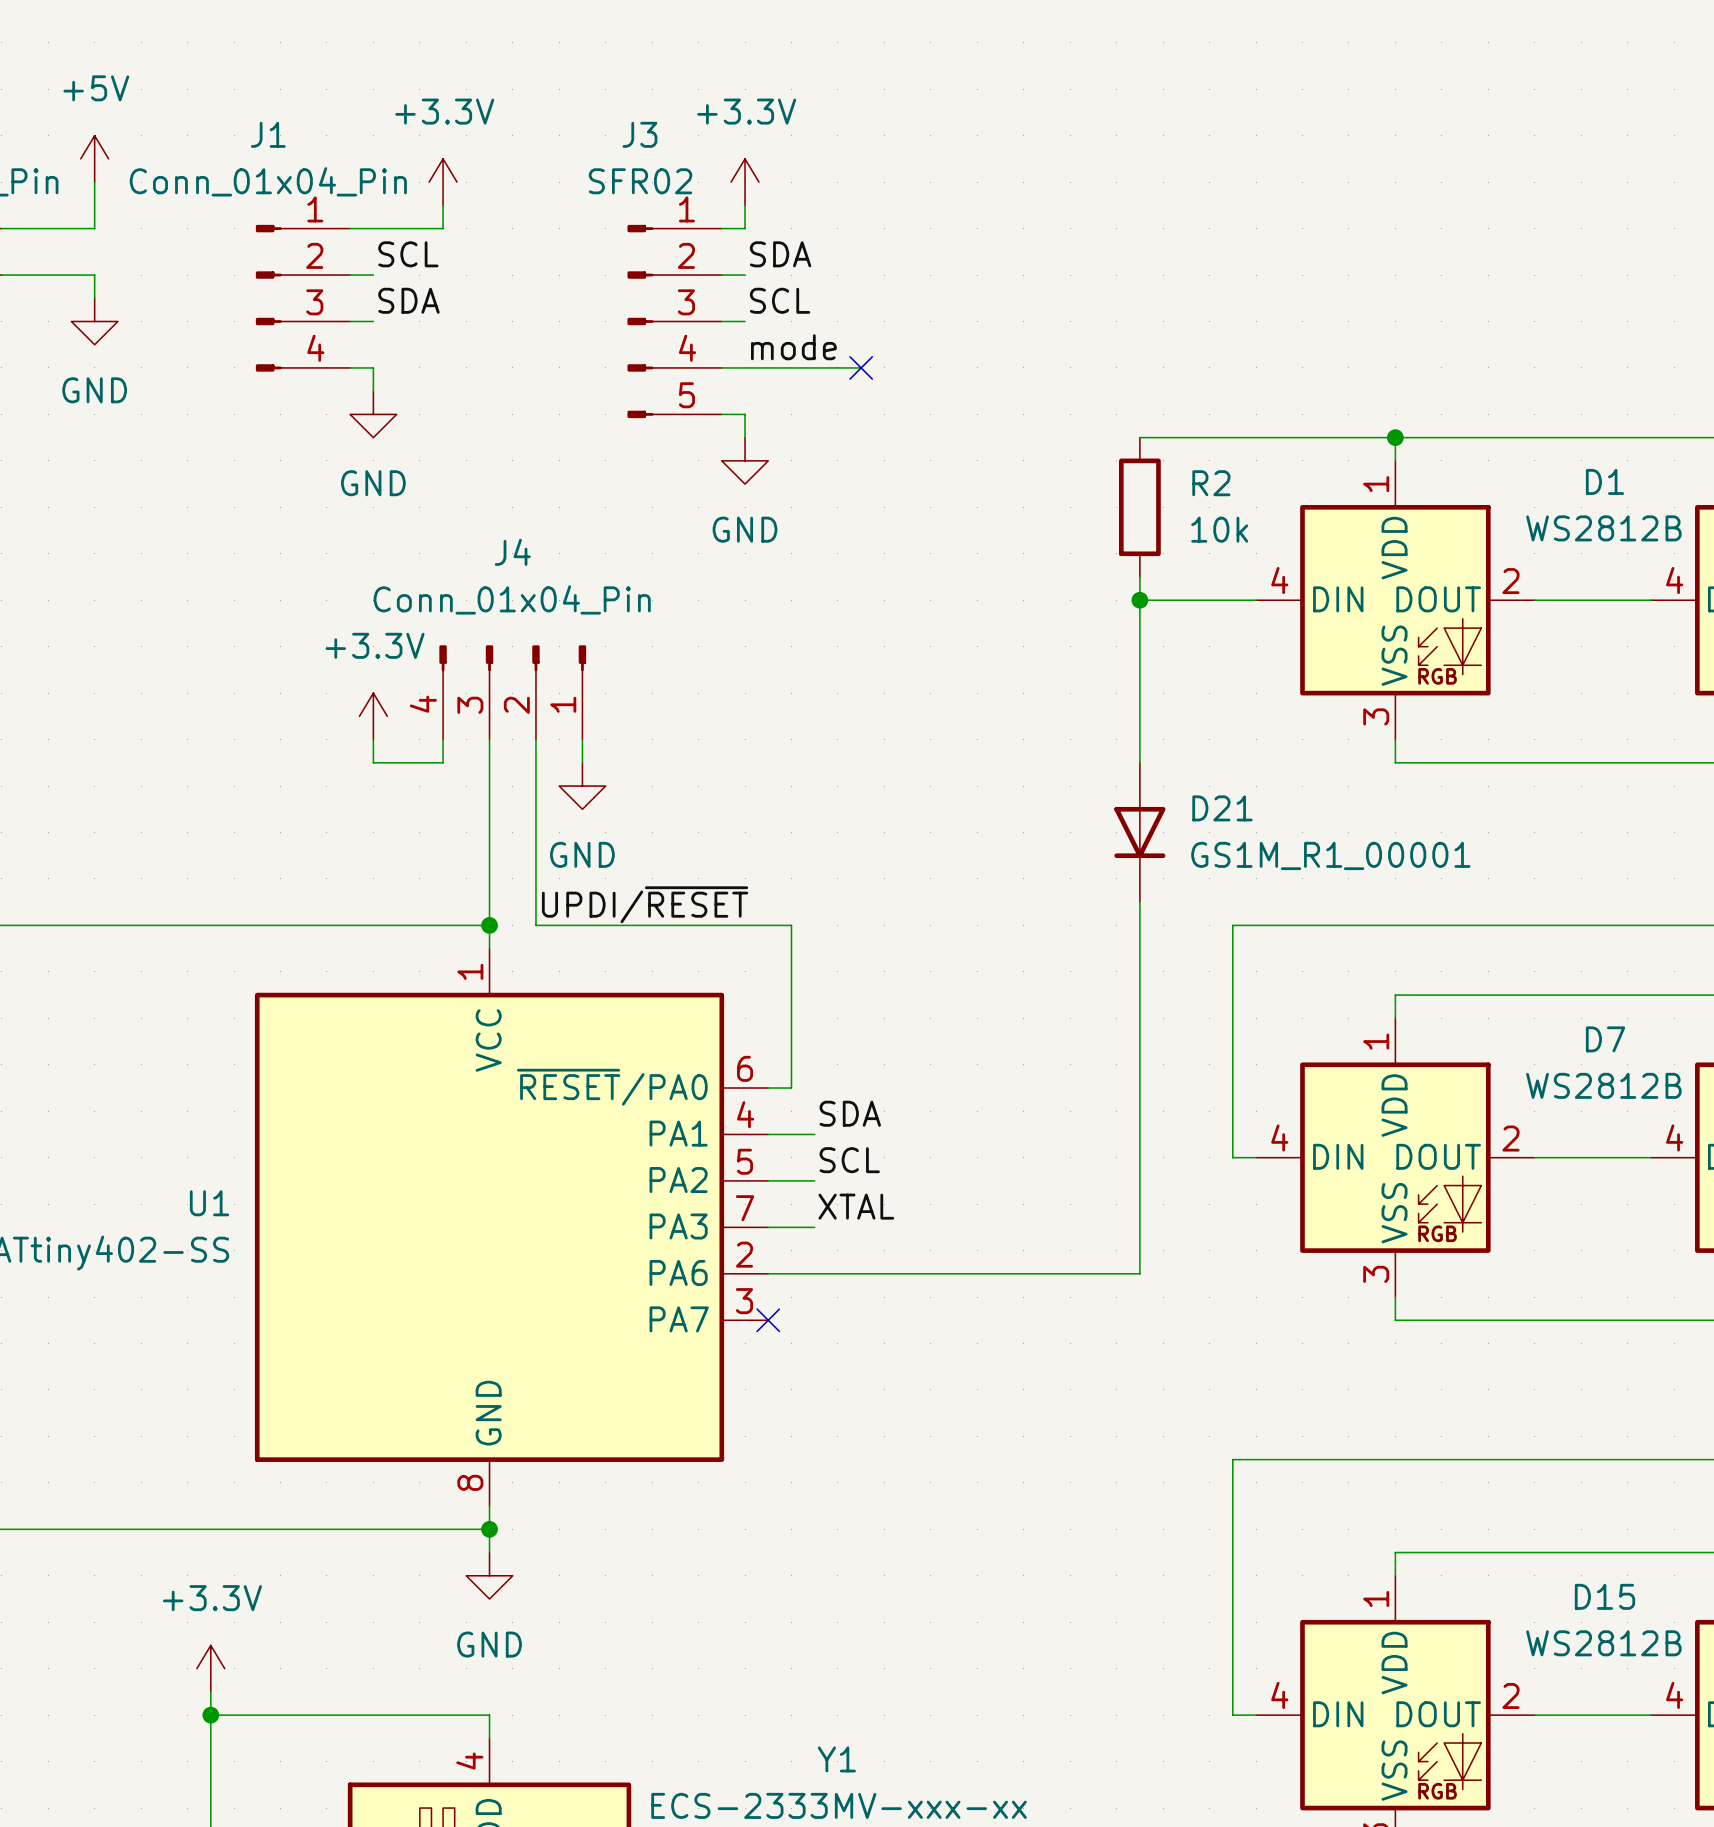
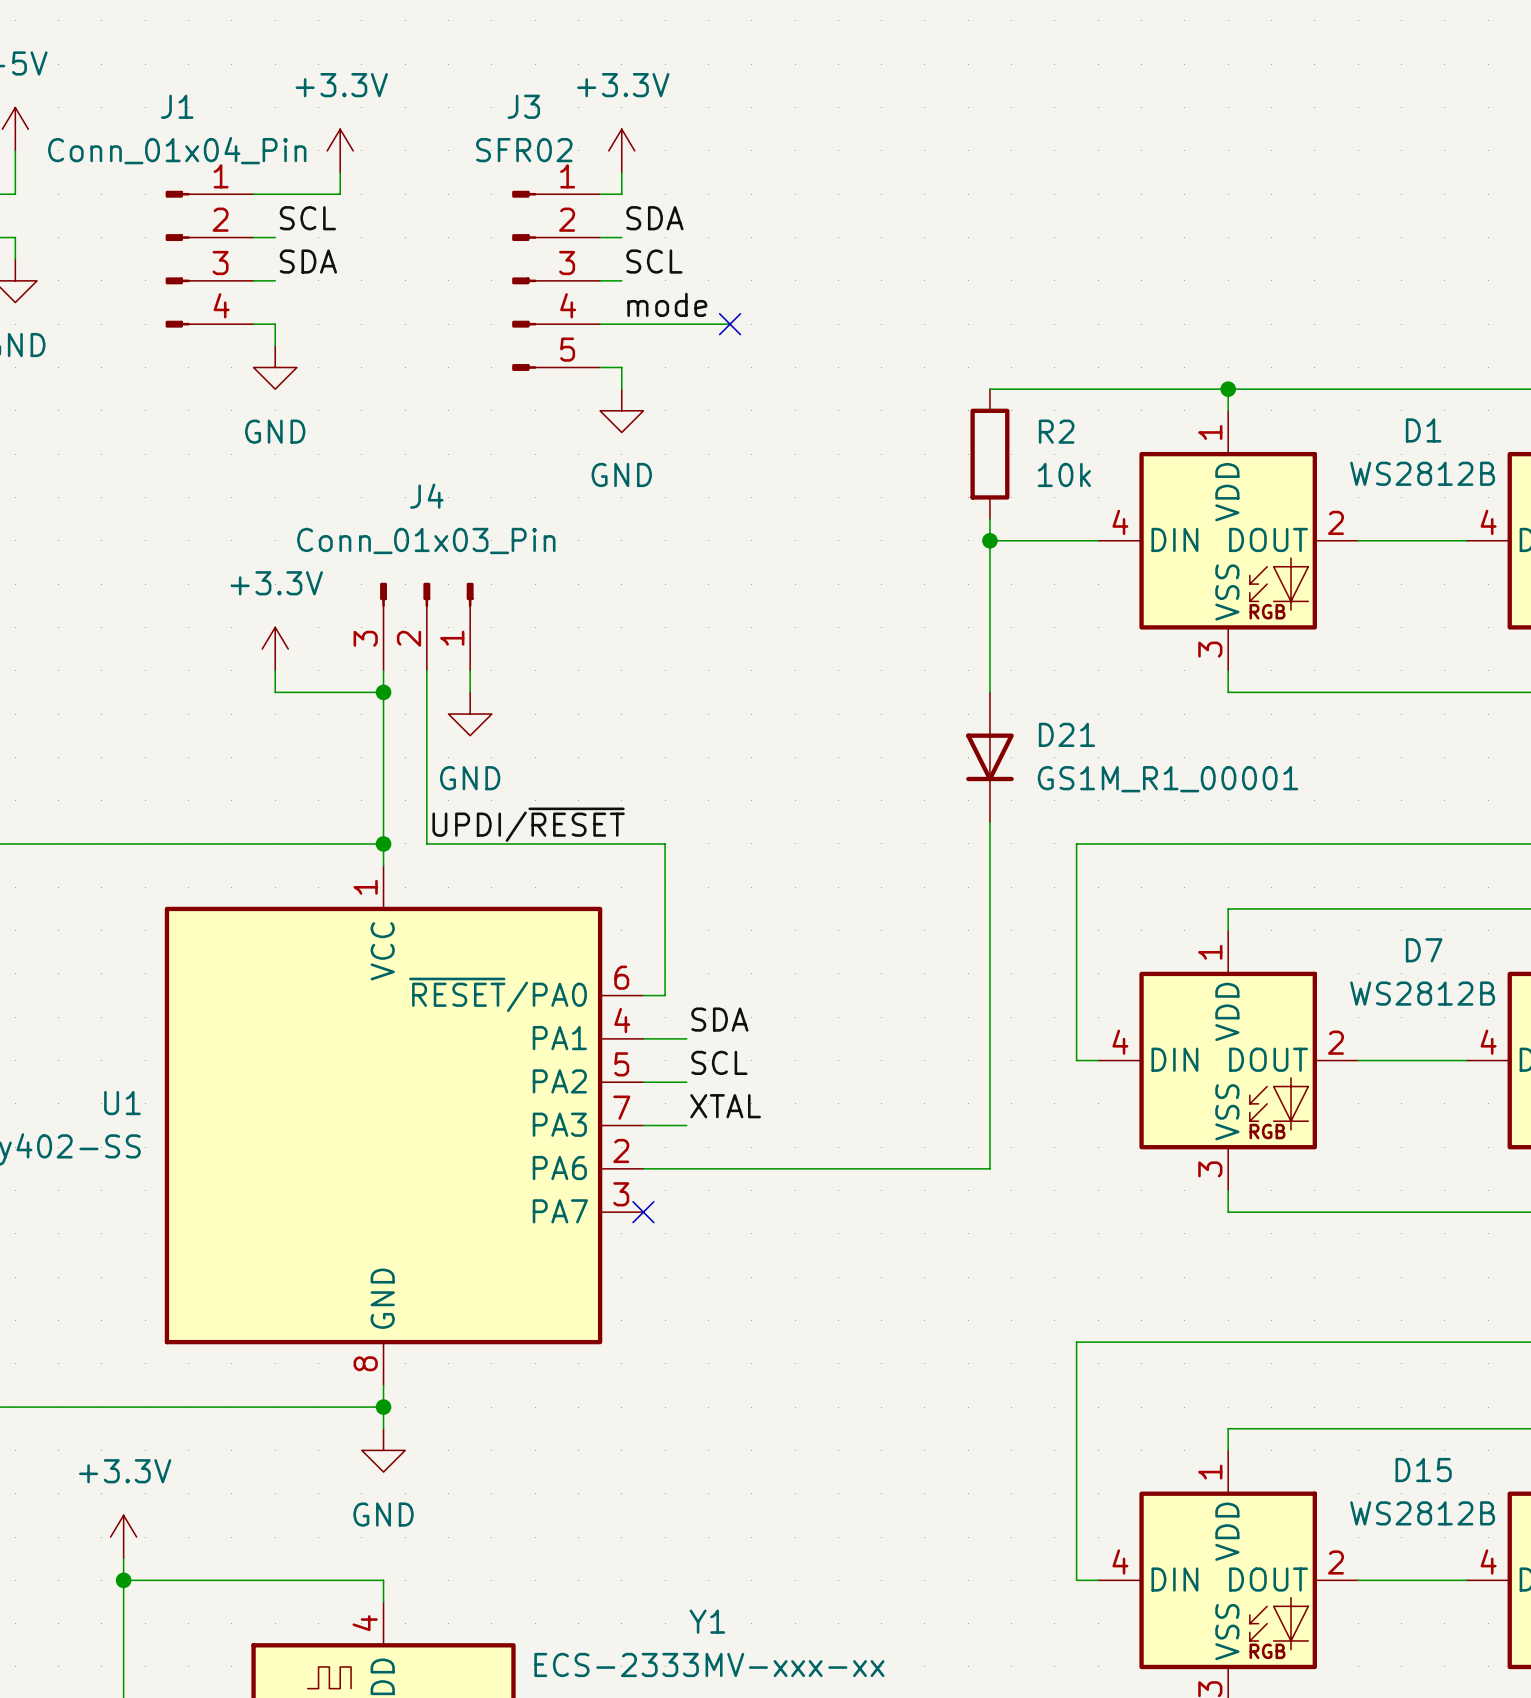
J4 value: Conn_01x04_Pin (512, 599) -> Conn_01x03_Pin (426, 540)
J4 symbol: [439, 645, 587, 740] -> [380, 582, 474, 671]
wire: (443, 739) (443, 762) -> (383, 692) (340, 692)
junction: none -> (383, 692)

